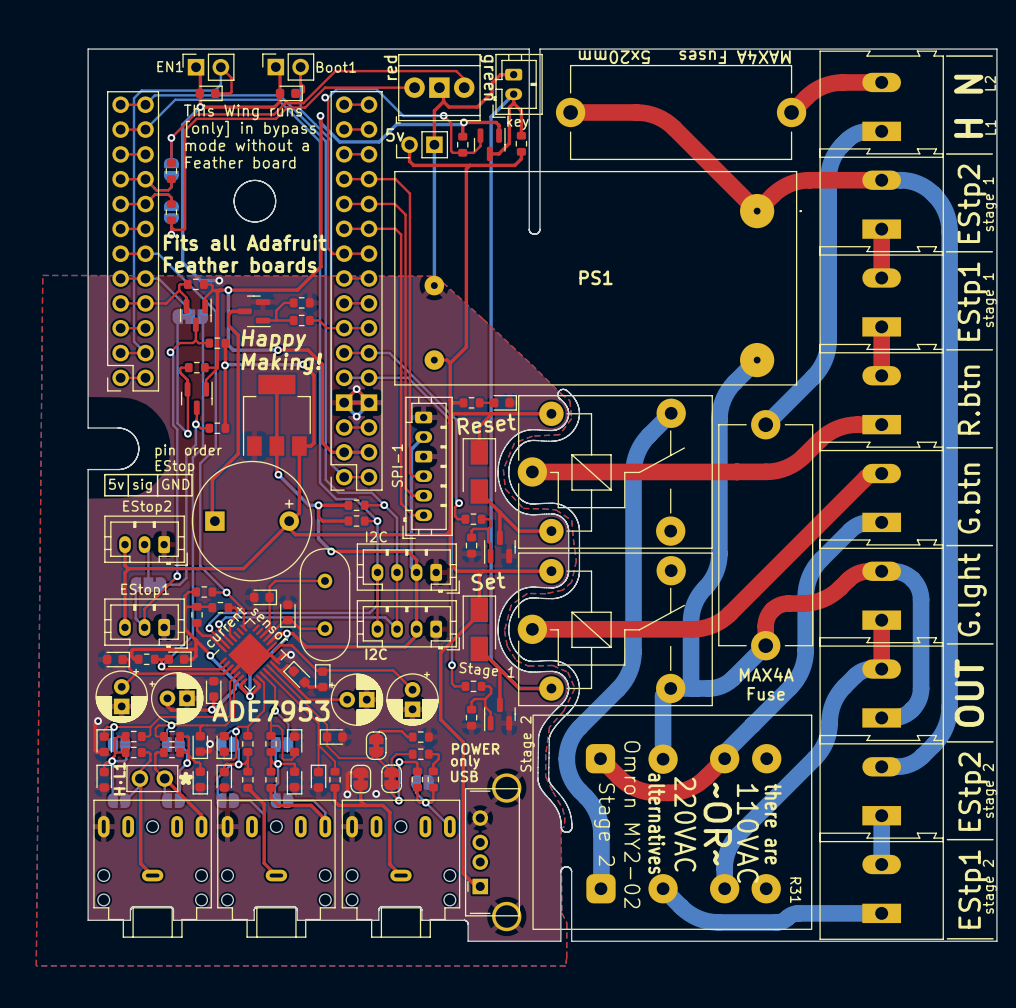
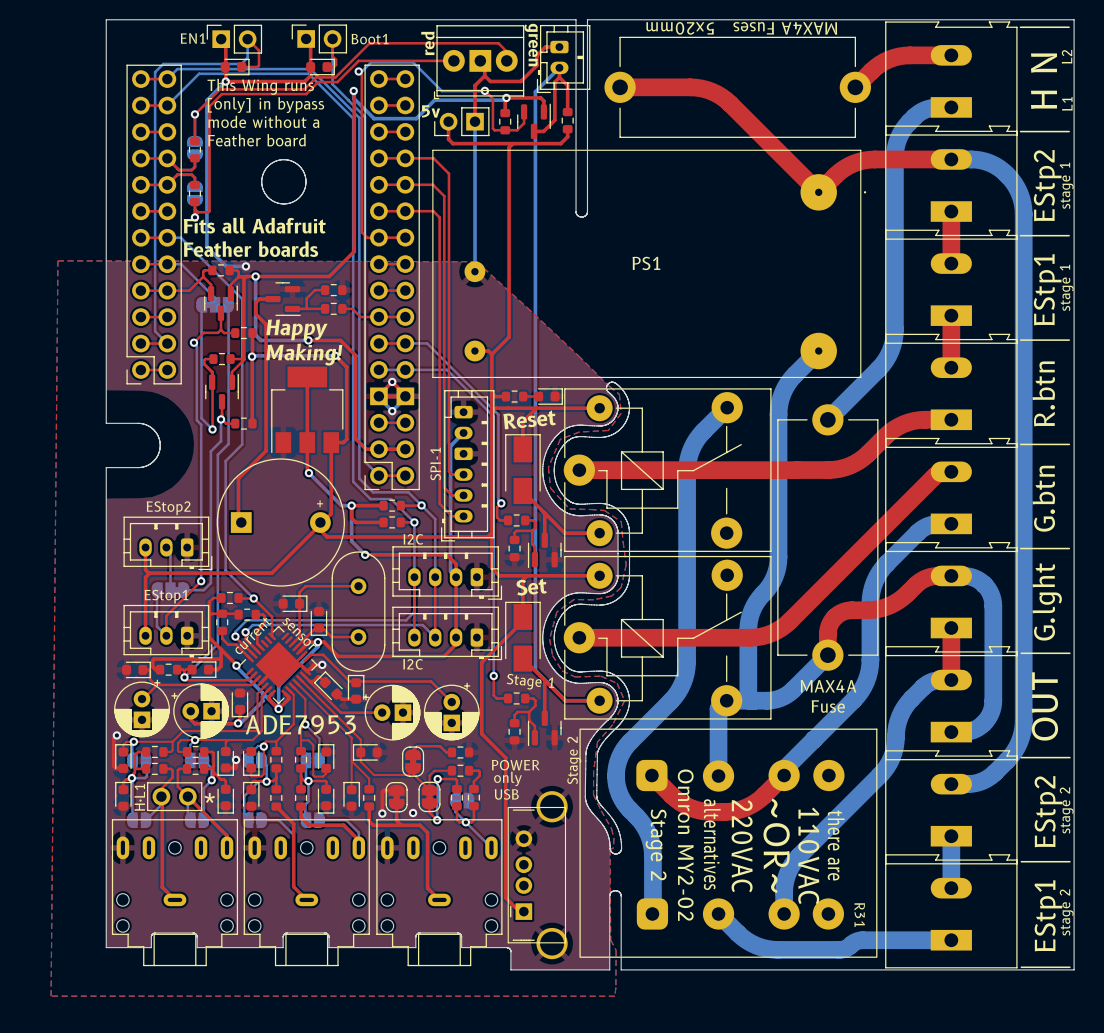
text: key (517, 122) -> none
text: pin order (188, 451) -> none
text: EStop (174, 467) -> none
line: (104, 474) (104, 495) (192, 495) (192, 474) (104, 474) -> none
line: (128, 474) (128, 495) -> none
line: (157, 474) (157, 495) -> none
text: 5v sig GND (149, 485) -> none

